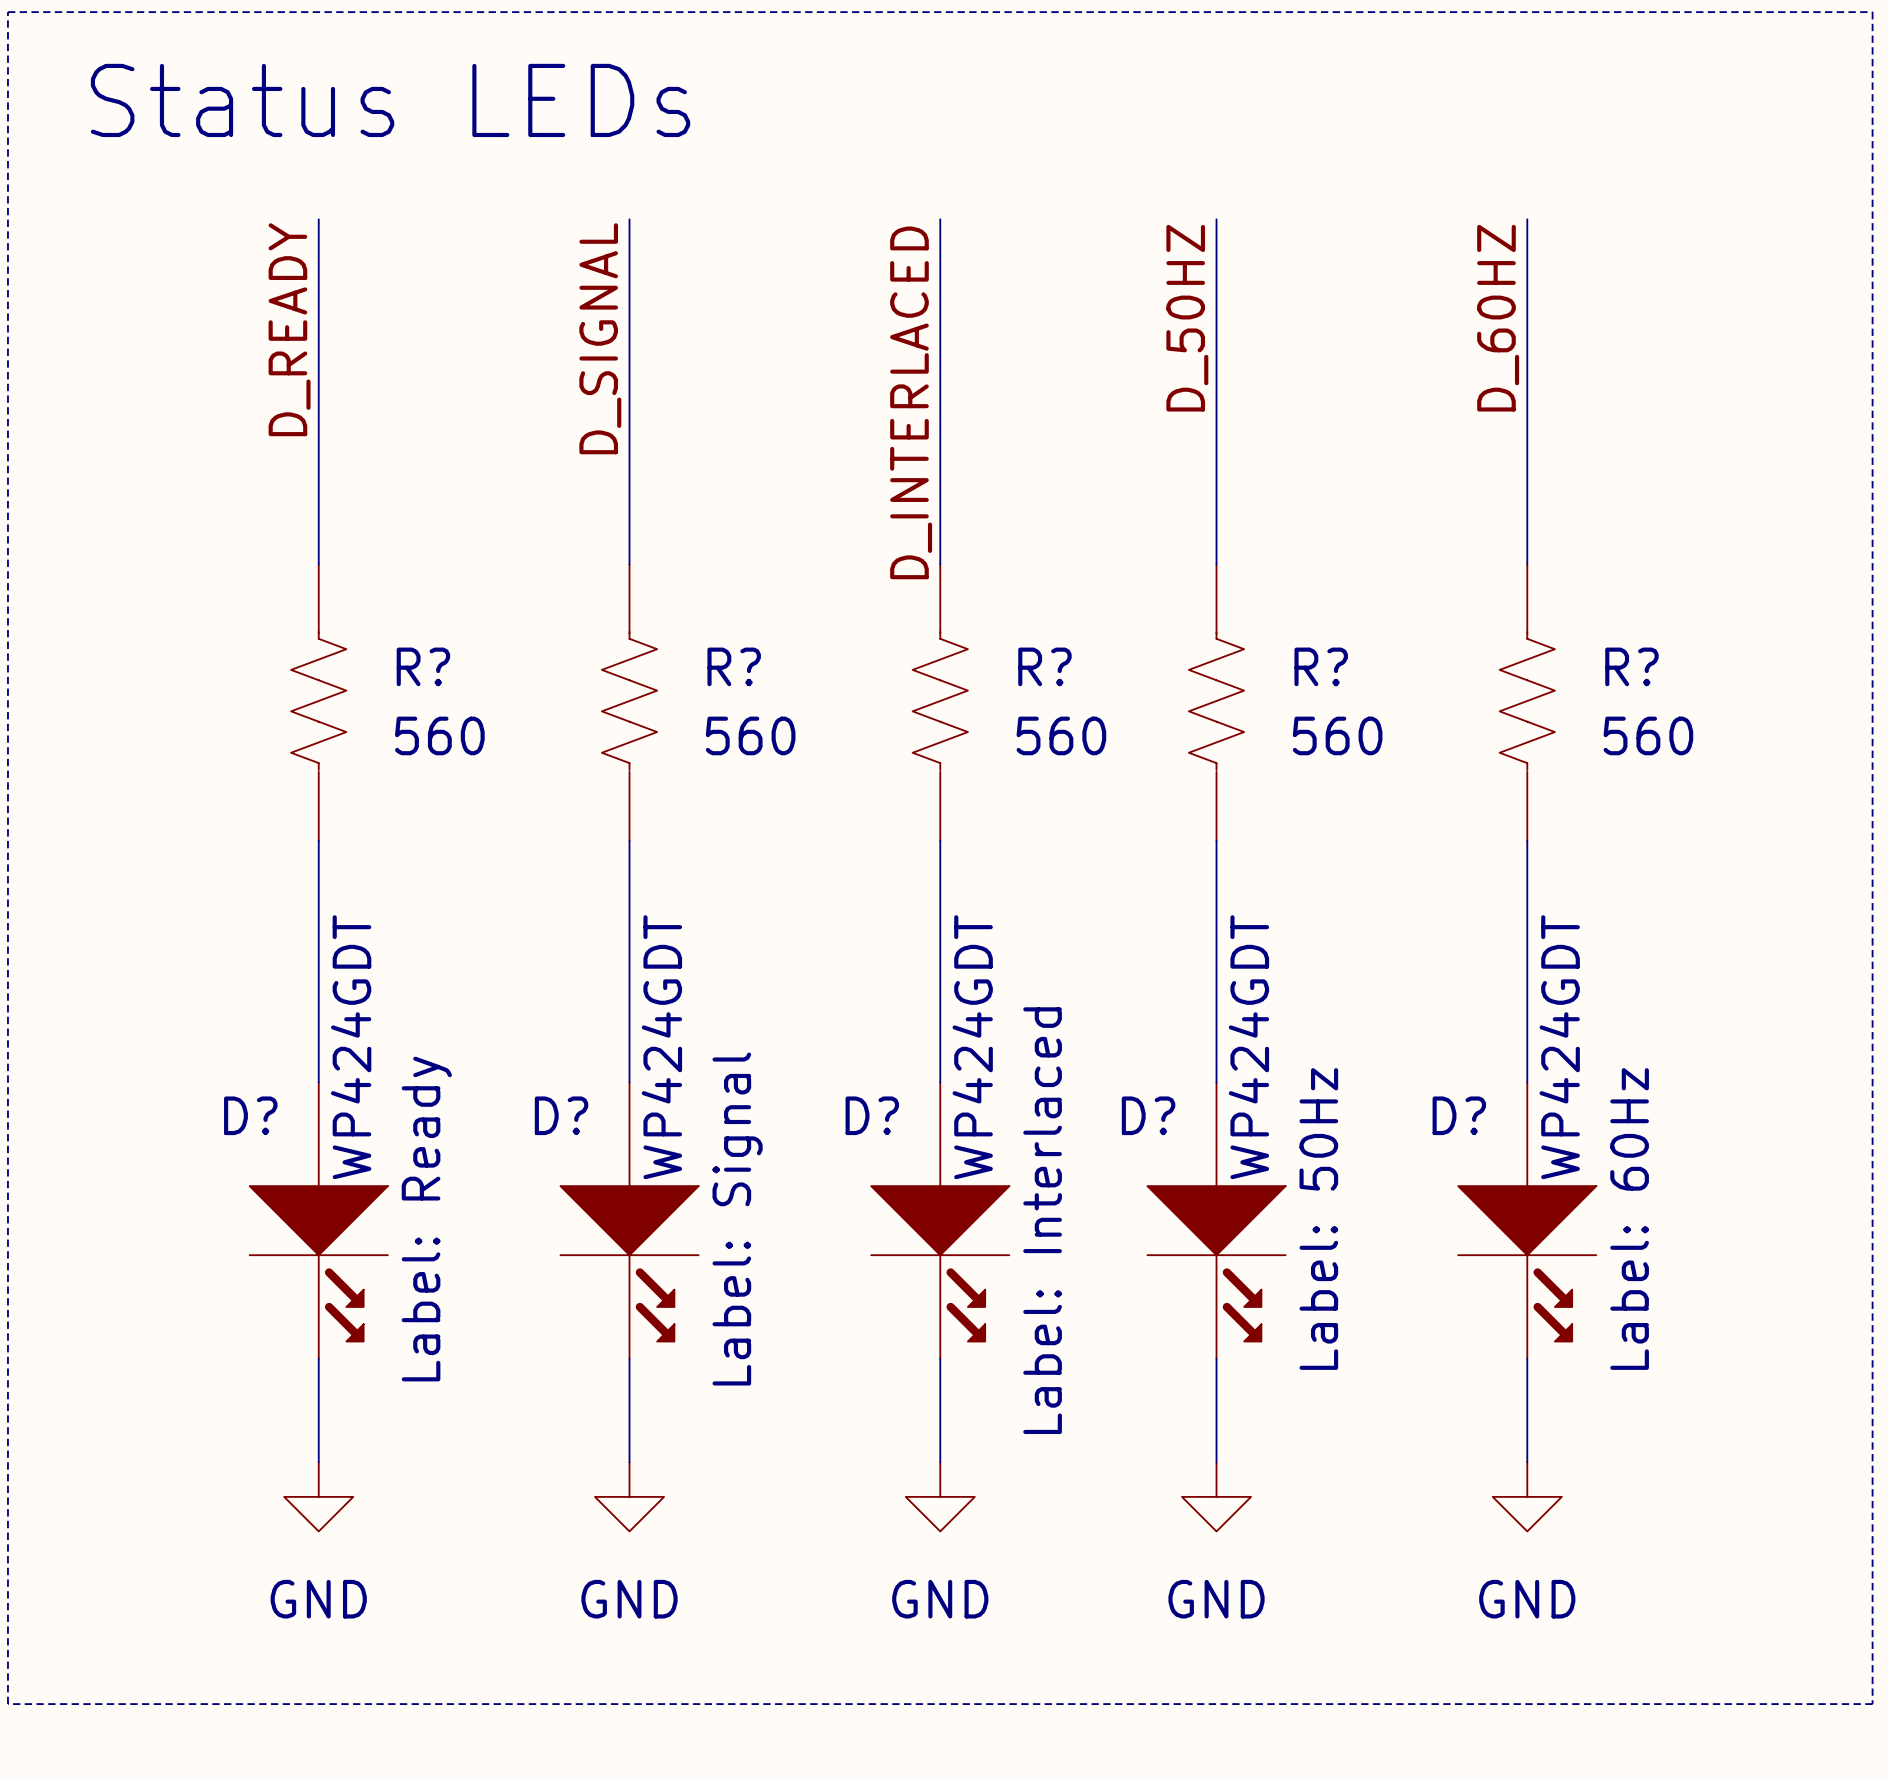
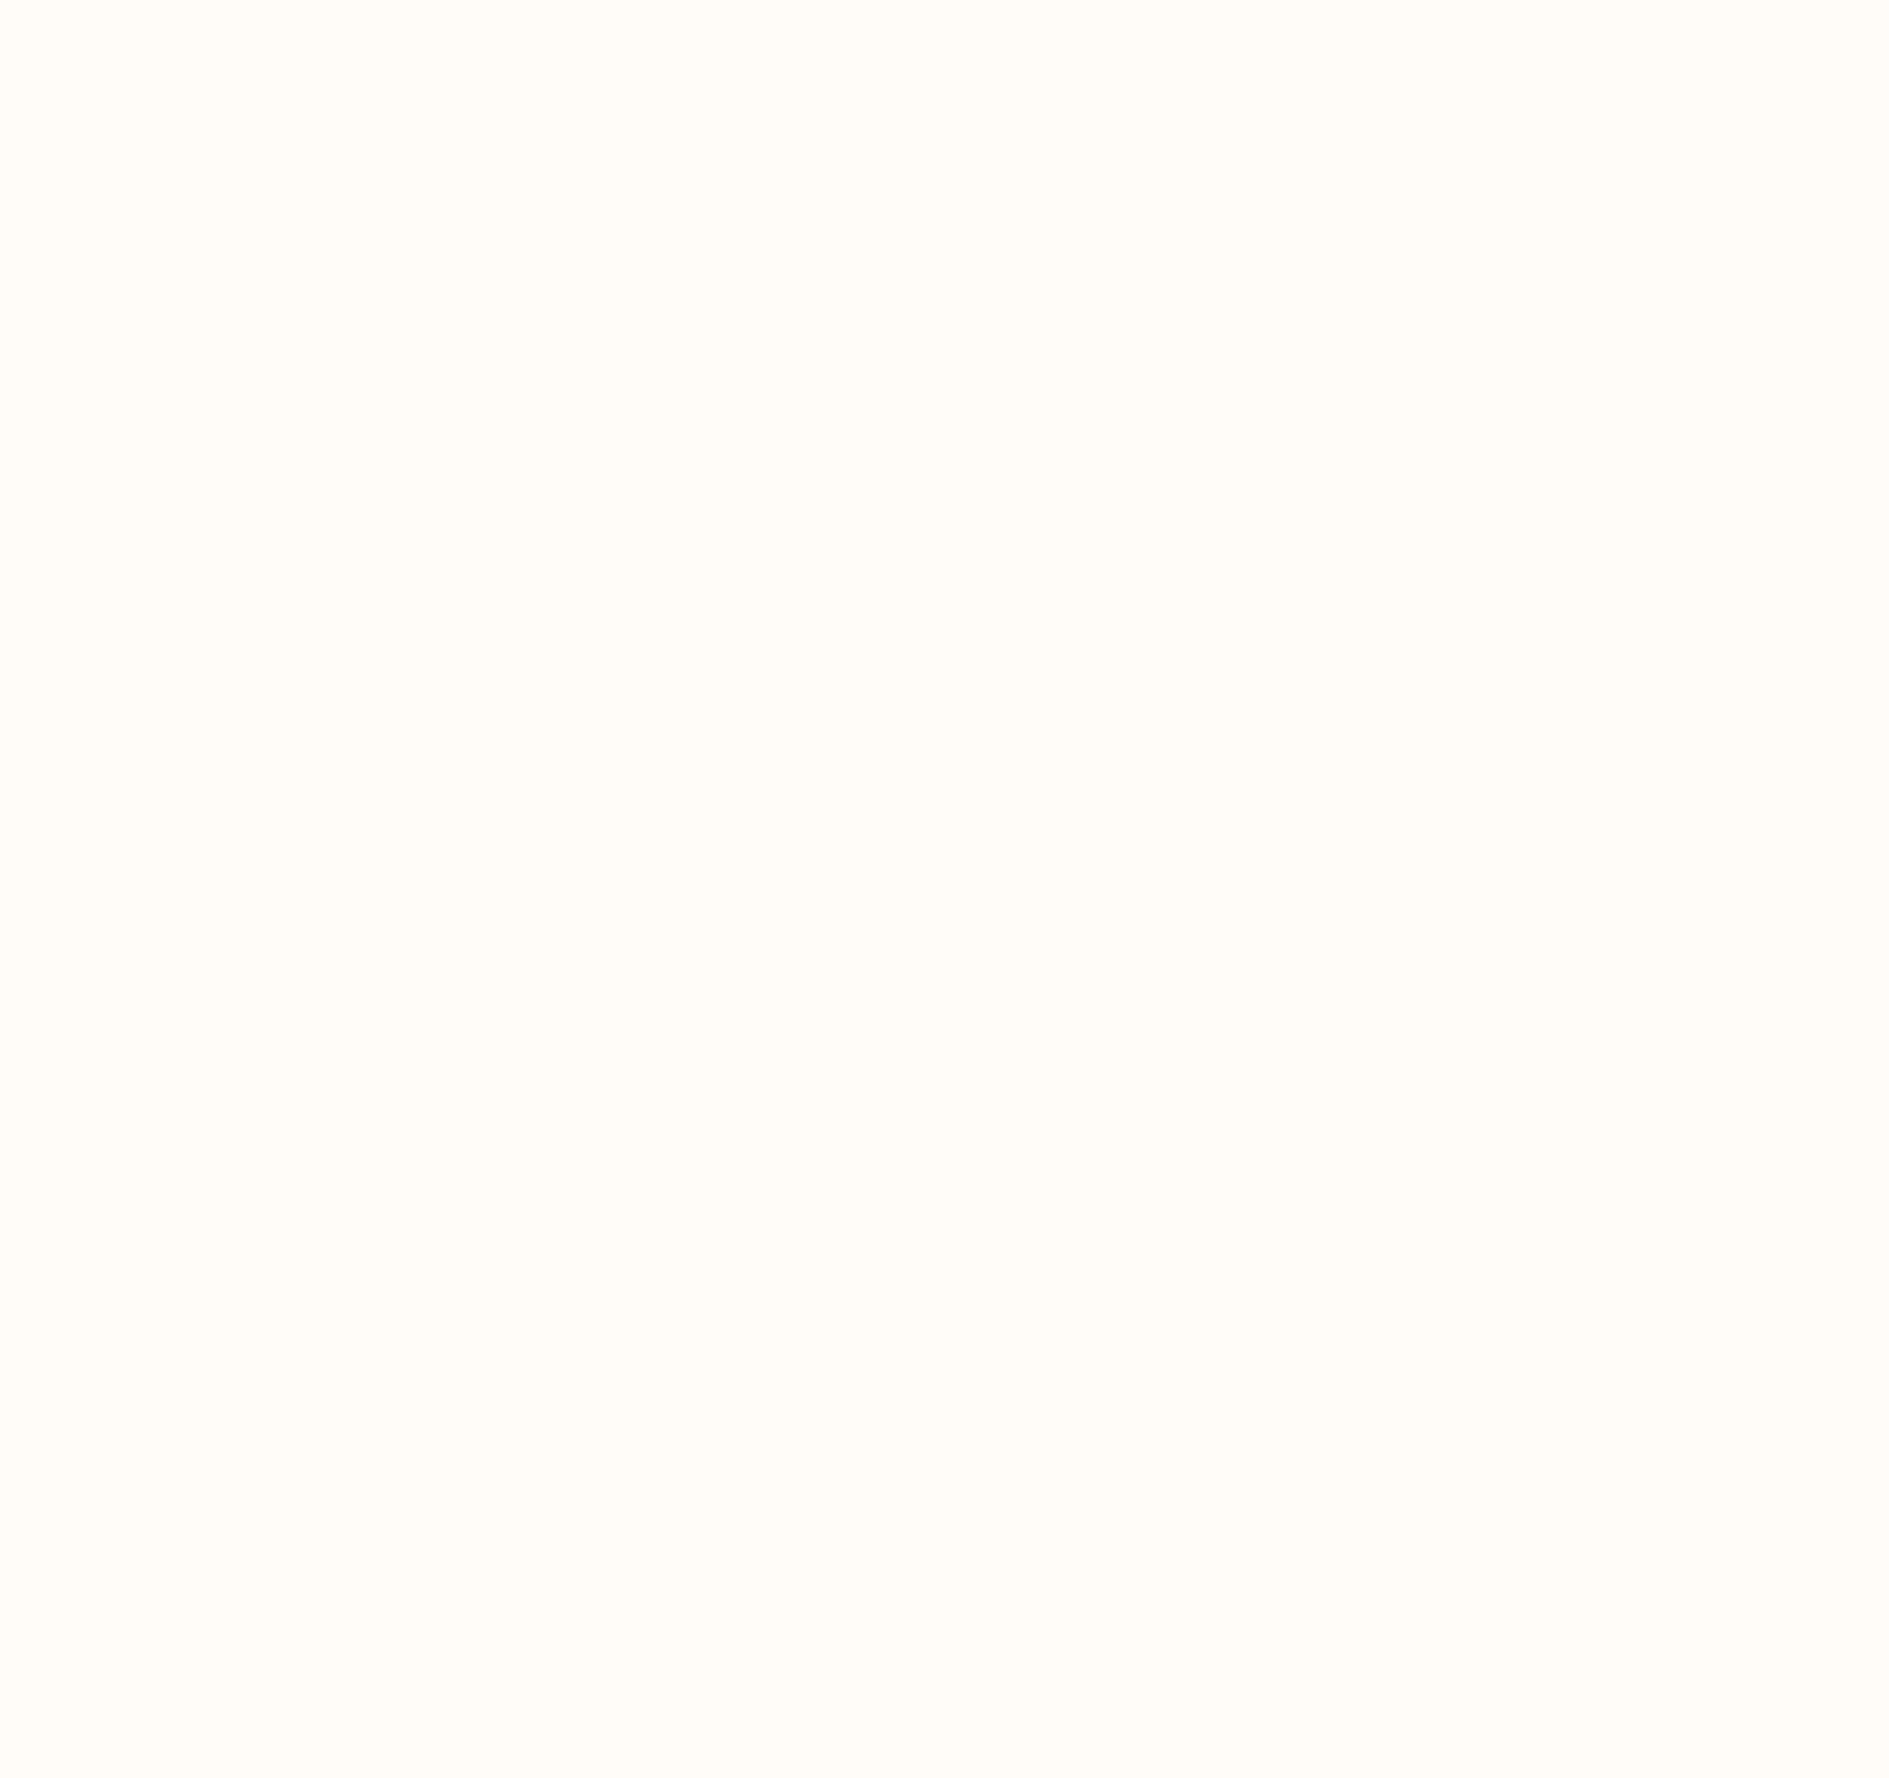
line: (7, 12) (1872, 12) (1872, 1704) (7, 1704) (7, 12) -> none
text: Status LEDs (390, 100) -> none
wire: (318, 219) (318, 564) -> none
wire: (629, 219) (629, 564) -> none
wire: (940, 219) (940, 564) -> none
wire: (1216, 219) (1216, 564) -> none
wire: (1527, 219) (1527, 564) -> none
label: D_50HZ (1187, 318) -> none
label: D_60HZ (1498, 318) -> none
label: D_READY (289, 329) -> none
label: D_SIGNAL (600, 338) -> none
label: D_INTERLACED (911, 402) -> none
R?: 560 (318, 702) -> none
R?: 560 (629, 702) -> none
R?: 560 (940, 702) -> none
R?: 560 (1216, 702) -> none
R?: 560 (1527, 702) -> none
wire: (318, 840) (318, 1082) -> none
wire: (629, 840) (629, 1082) -> none
wire: (940, 840) (940, 1082) -> none
wire: (1216, 840) (1216, 1082) -> none
wire: (1527, 840) (1527, 1082) -> none
D?: WP424GDT (318, 1220) -> none
D?: WP424GDT (629, 1220) -> none
D?: WP424GDT (940, 1220) -> none
D?: WP424GDT (1216, 1220) -> none
D?: WP424GDT (1527, 1220) -> none
wire: (318, 1358) (318, 1462) -> none
wire: (629, 1358) (629, 1462) -> none
wire: (940, 1358) (940, 1462) -> none
wire: (1216, 1358) (1216, 1462) -> none
wire: (1527, 1358) (1527, 1462) -> none
power symbol: GND (318, 1496) -> none
power symbol: GND (629, 1496) -> none
power symbol: GND (940, 1496) -> none
power symbol: GND (1216, 1496) -> none
power symbol: GND (1527, 1496) -> none

